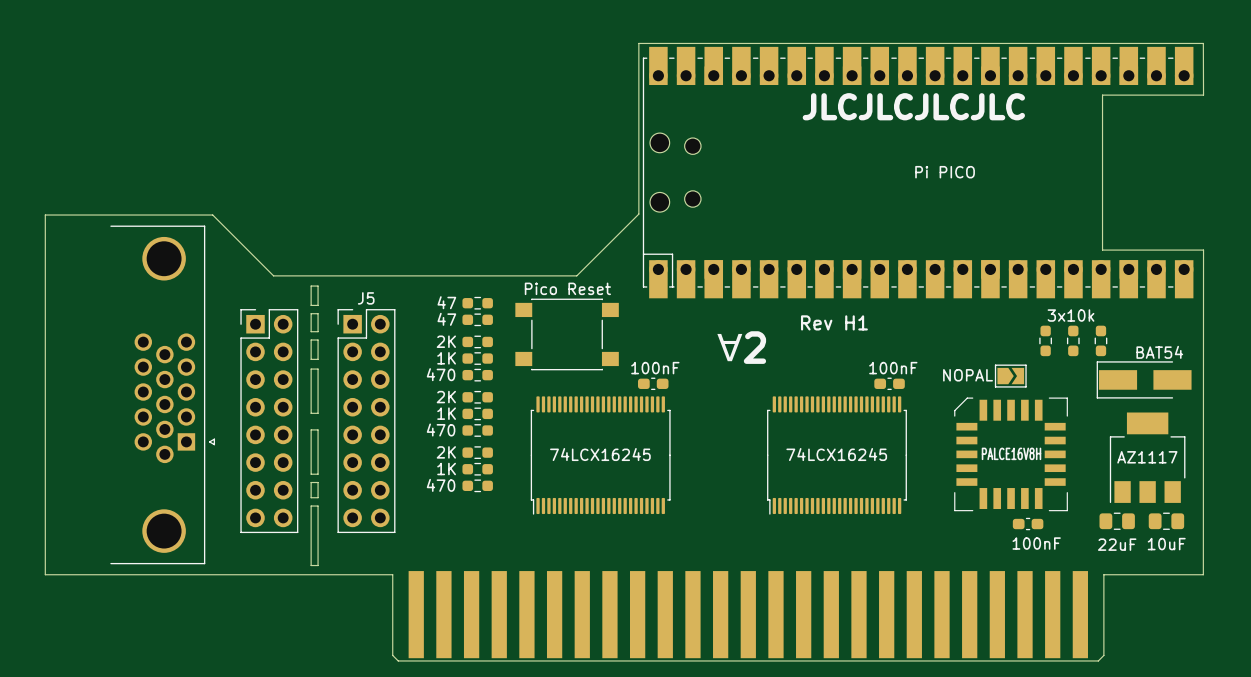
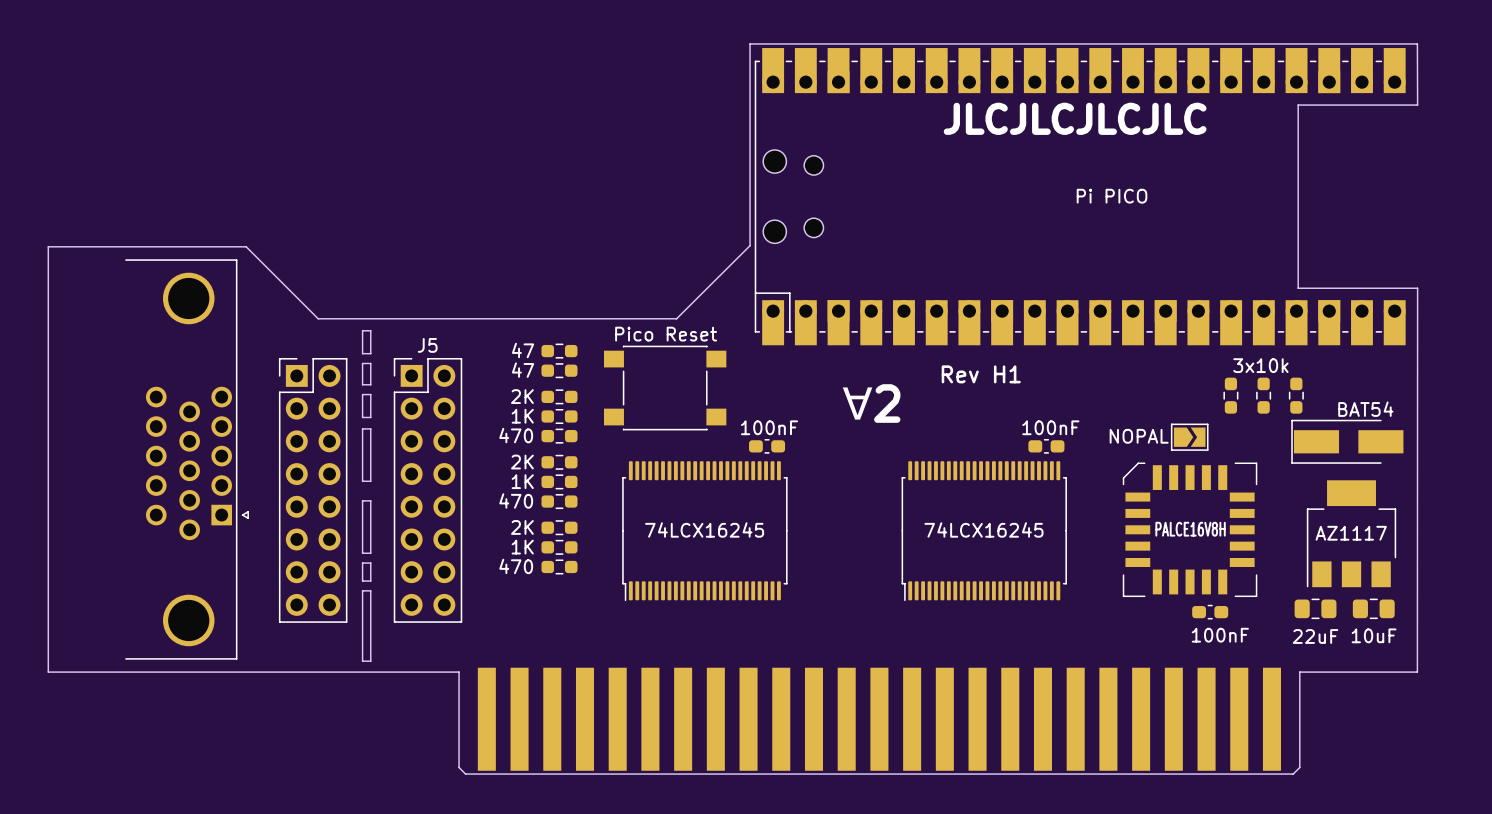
part footprint: [110, 225, 216, 565] -> [125, 259, 249, 660]

